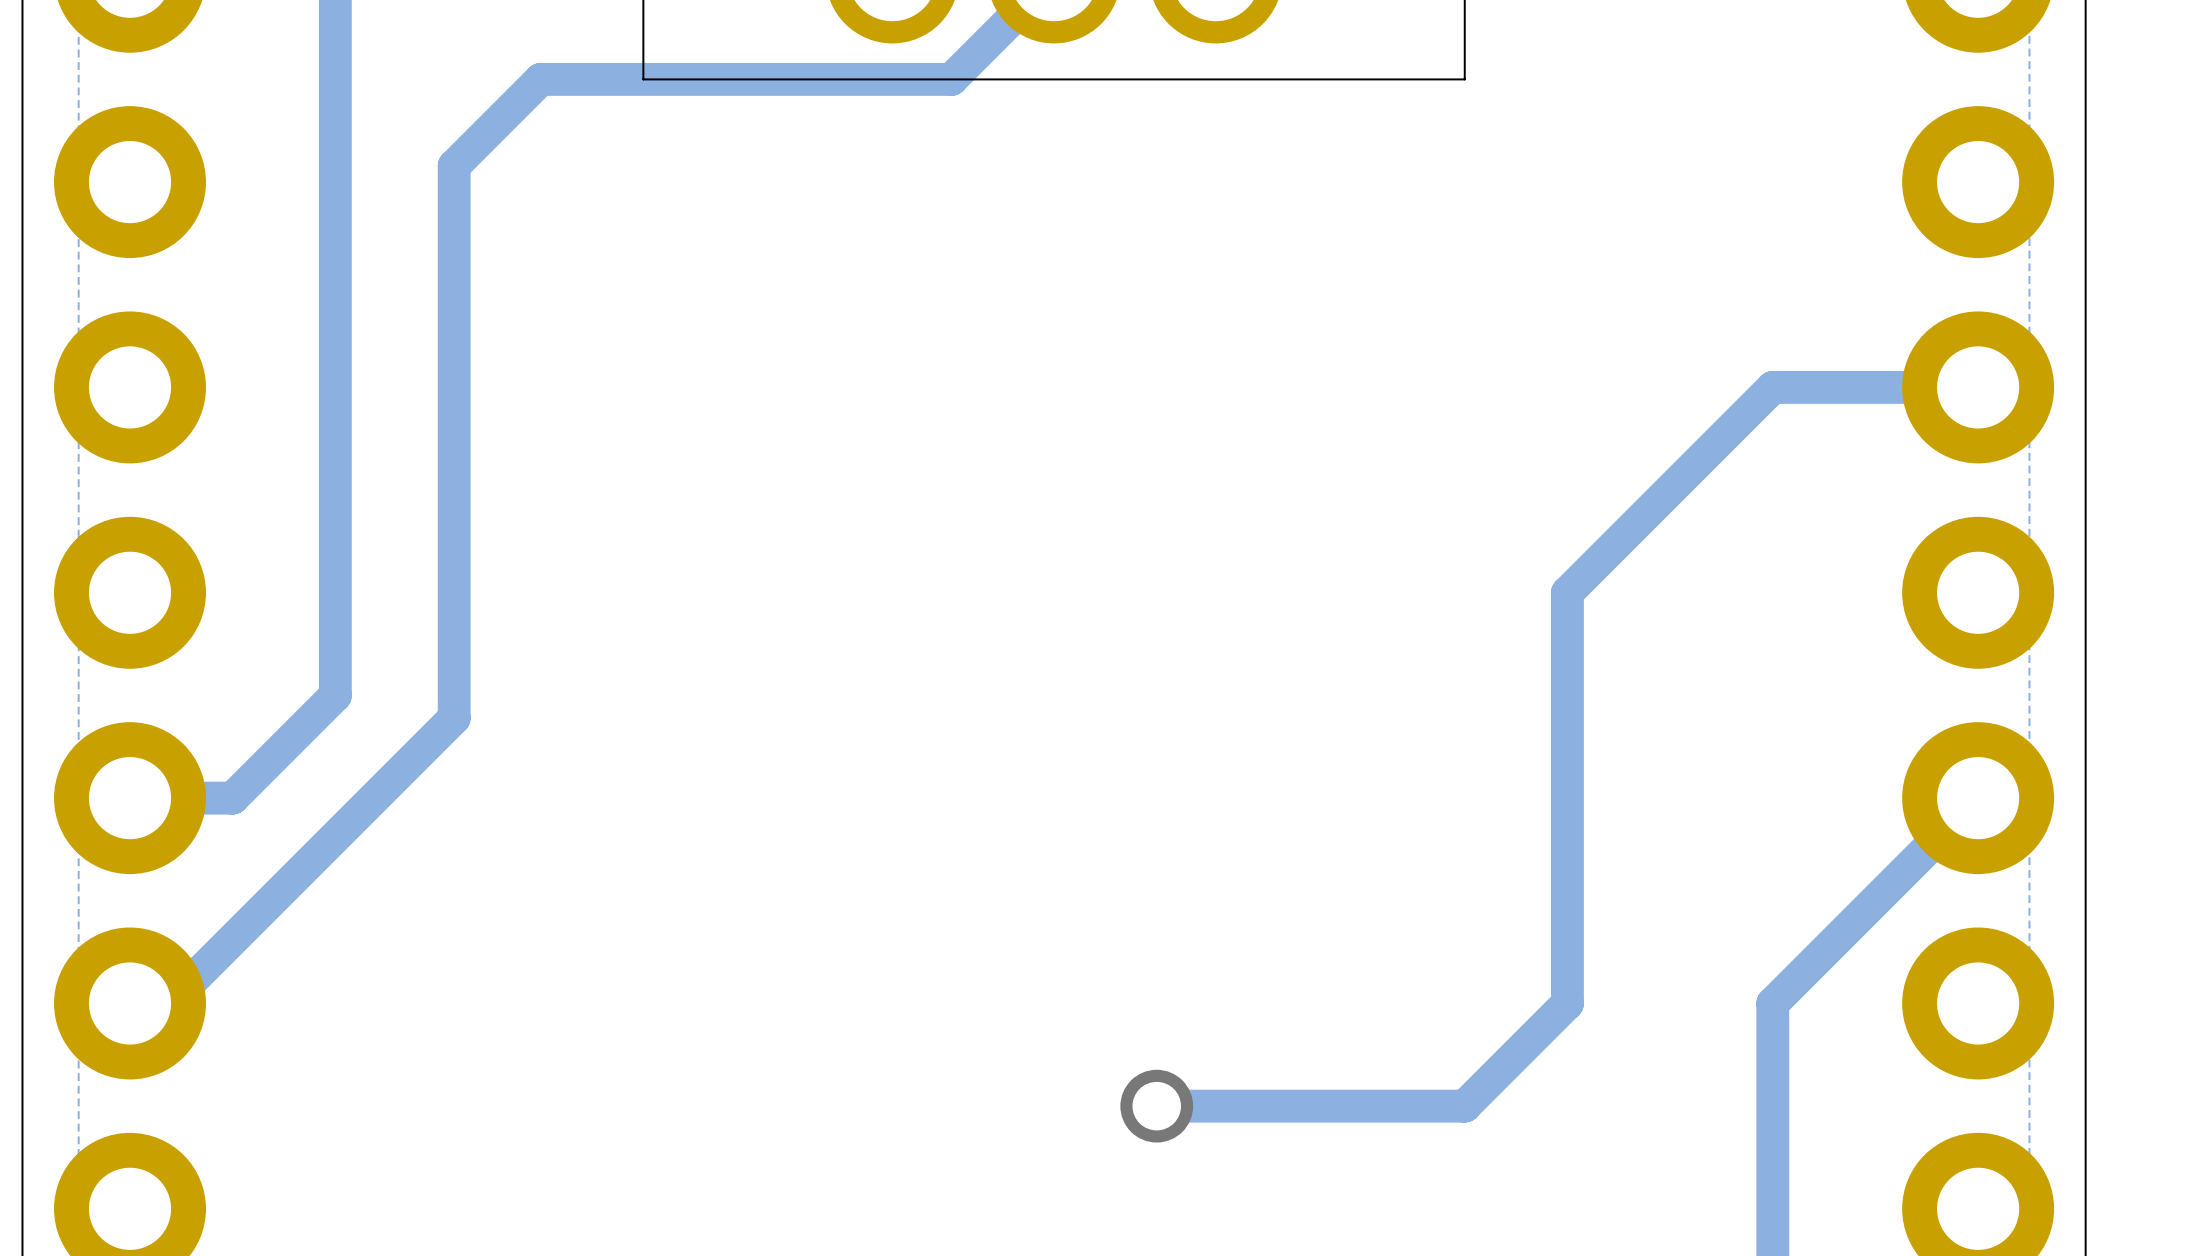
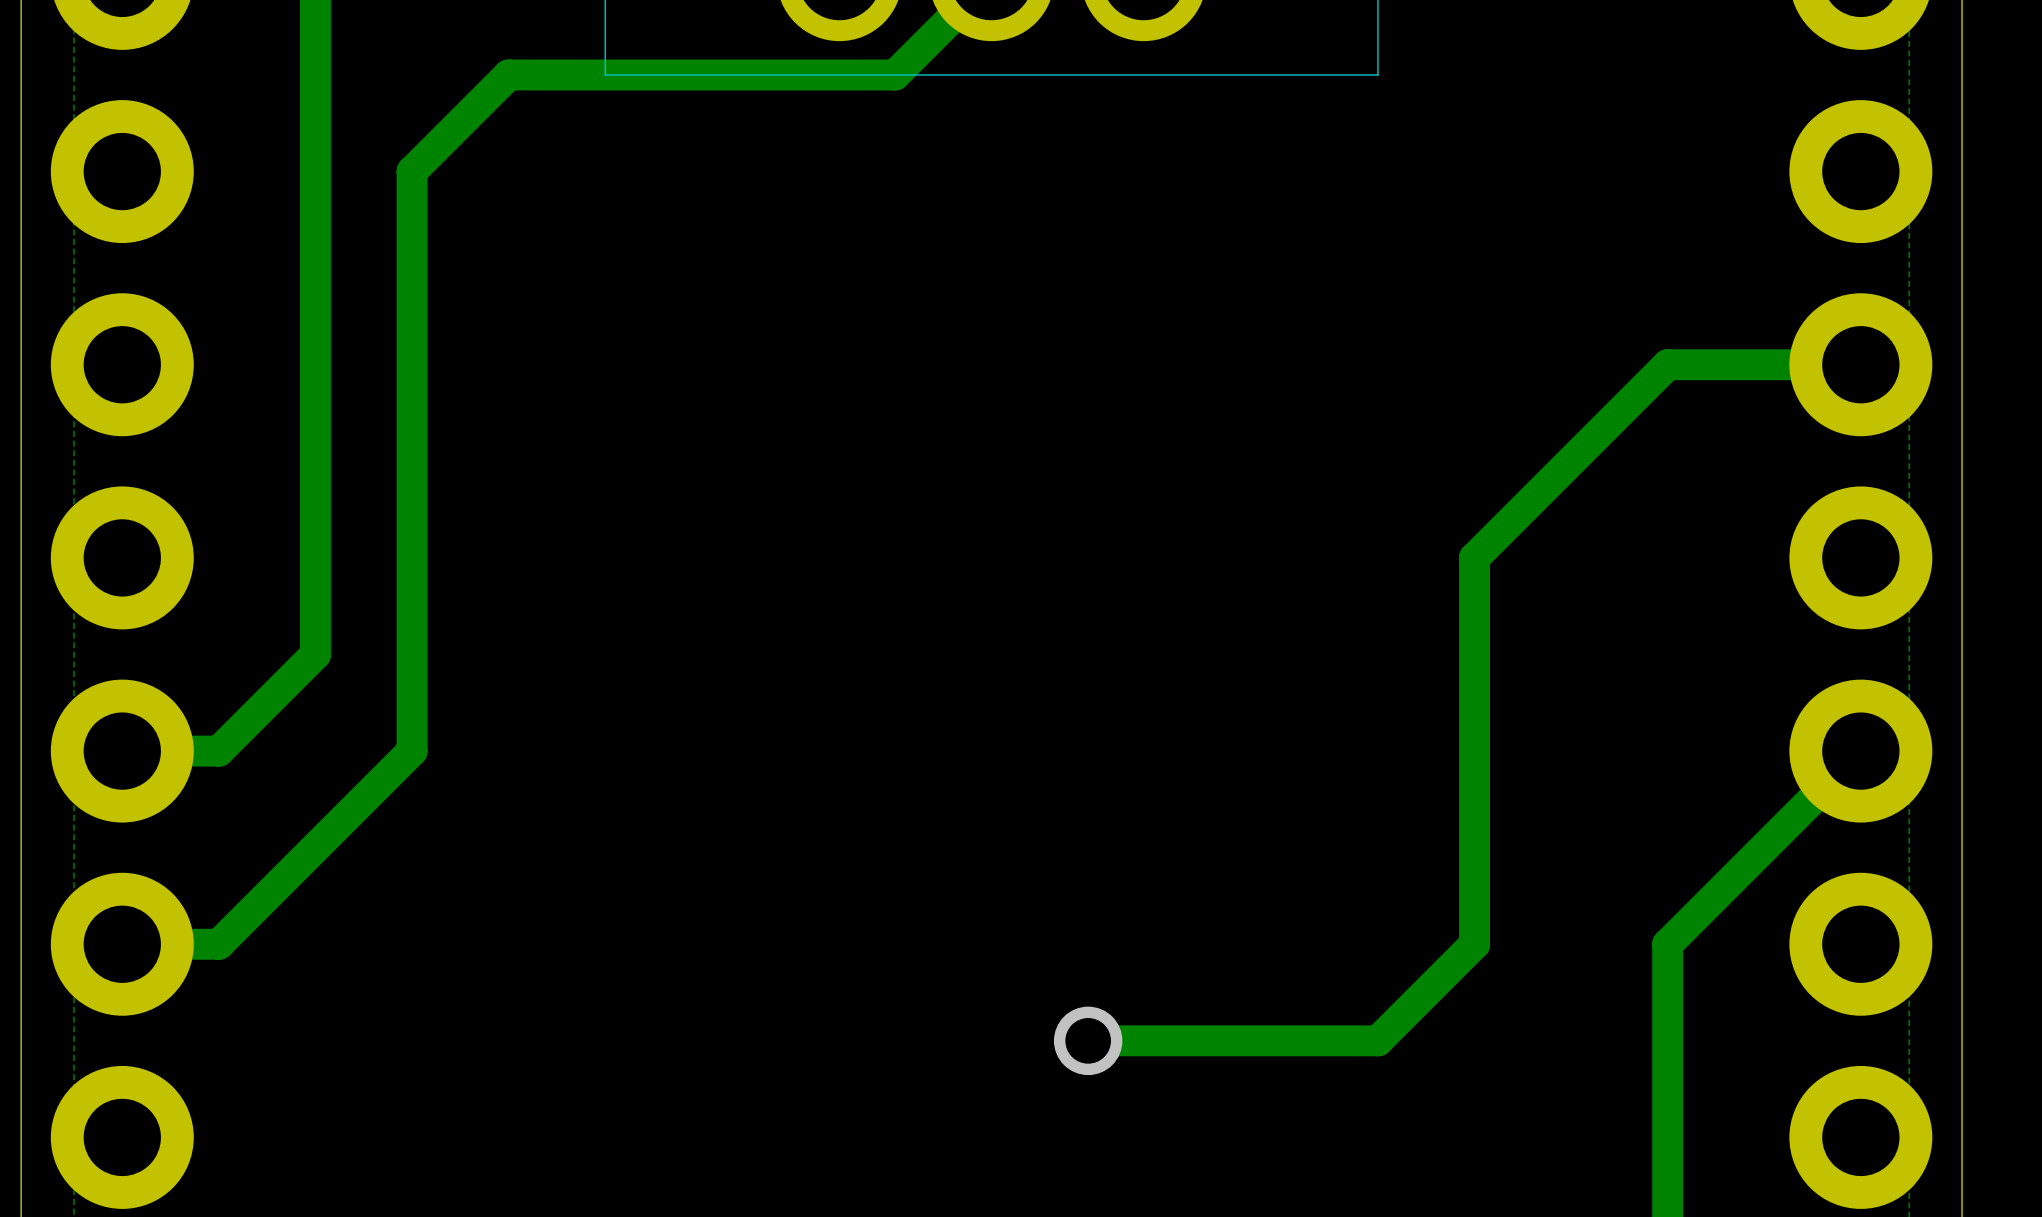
track: (454, 165) (454, 718) (184, 988) (145, 988) (130, 1003) -> (427, 156) (412, 171) (412, 751) (218, 944) (122, 944)

